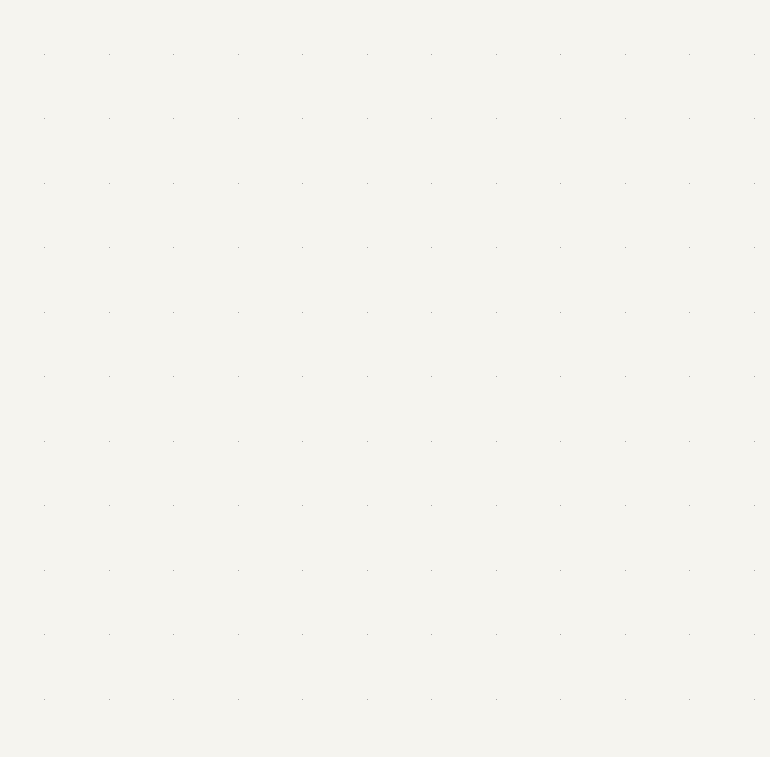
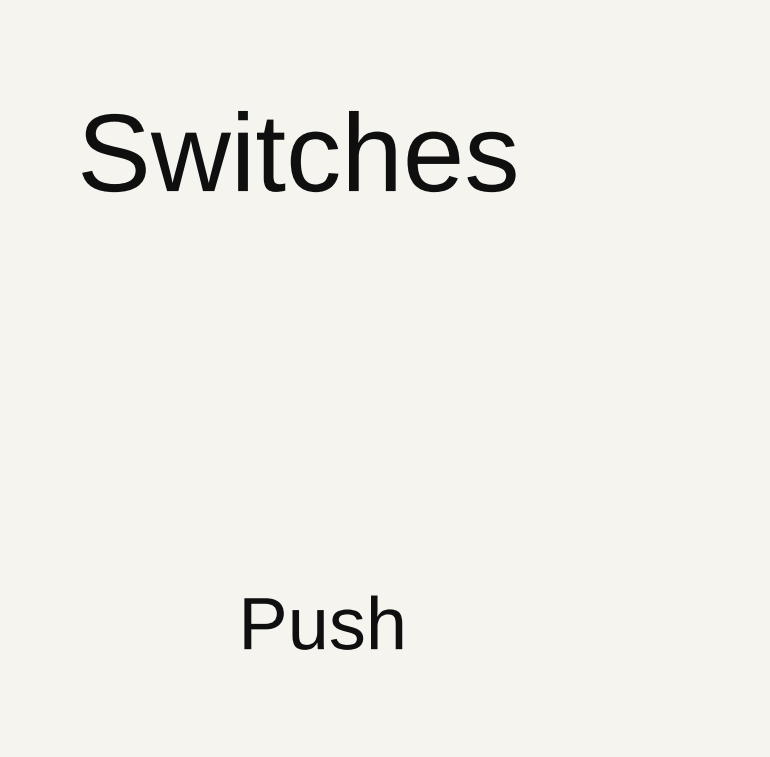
label: none -> Switches (298, 151)
label: none -> Push (323, 622)

